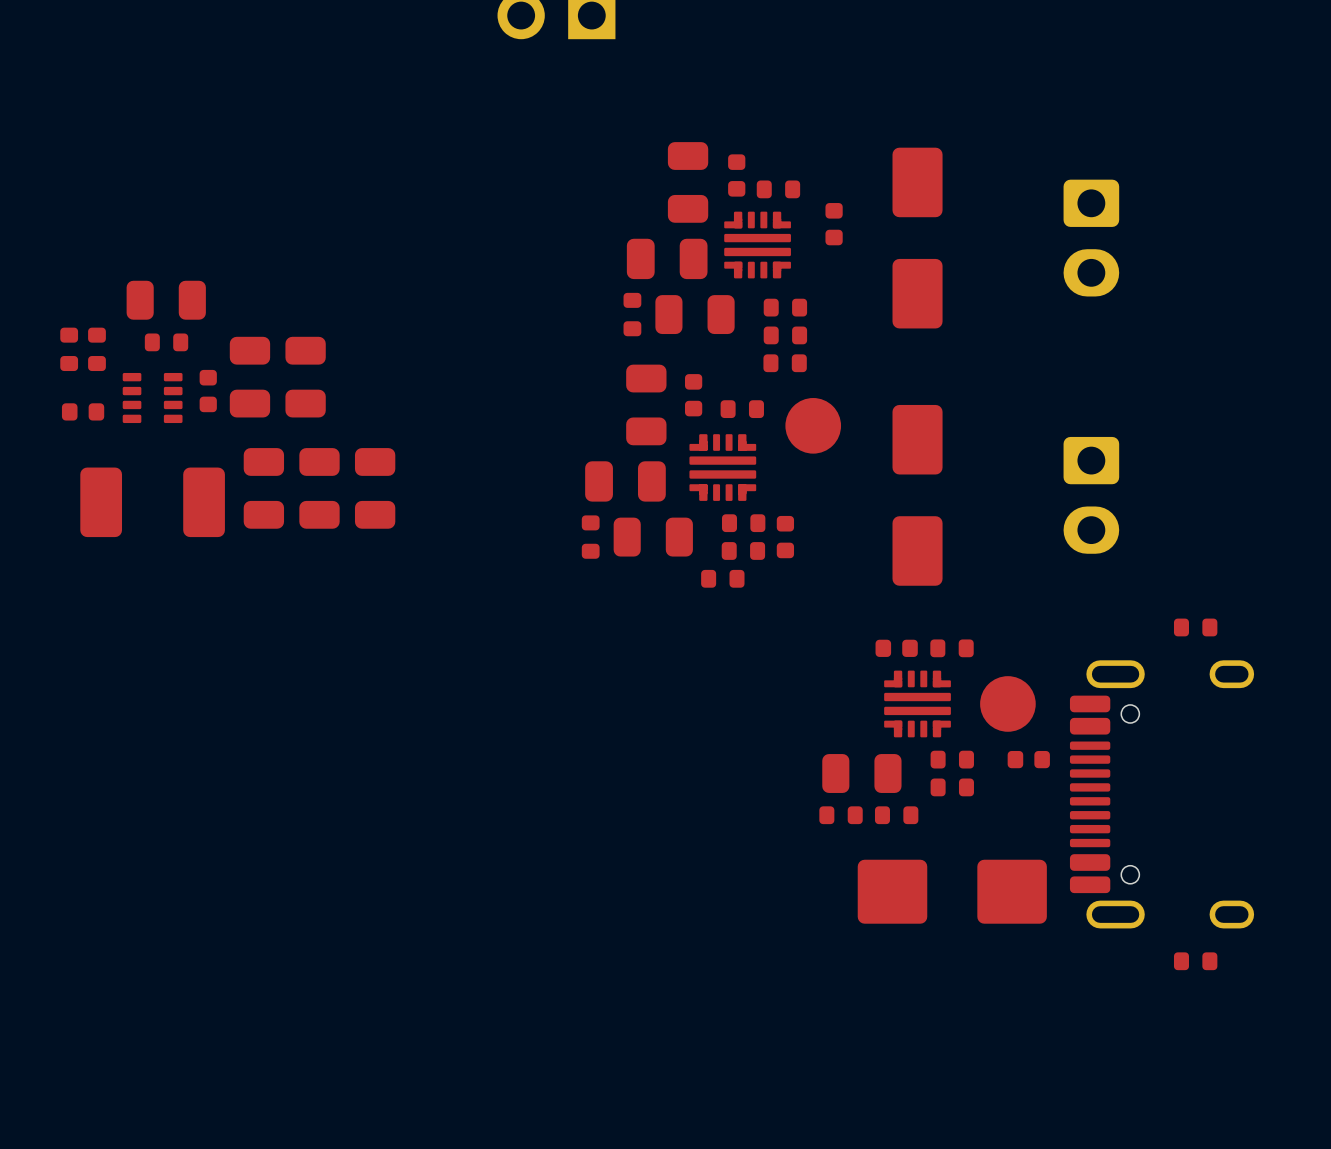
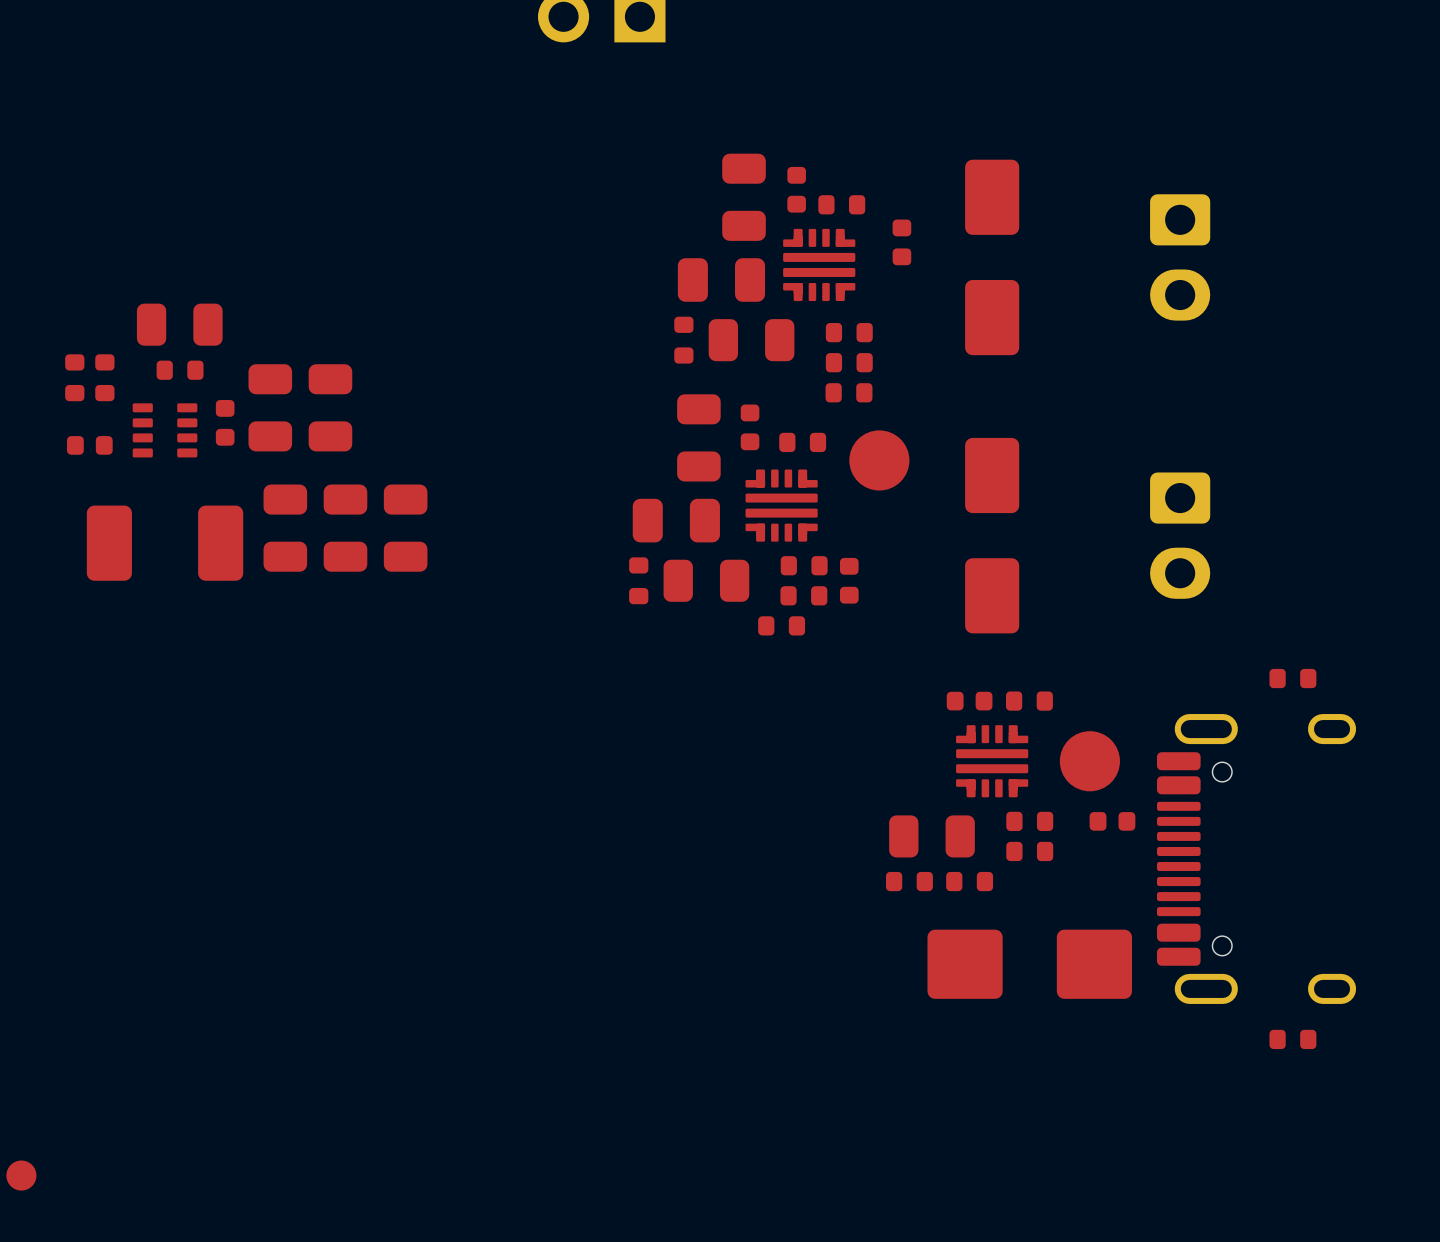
part: none -> (21, 1175)

